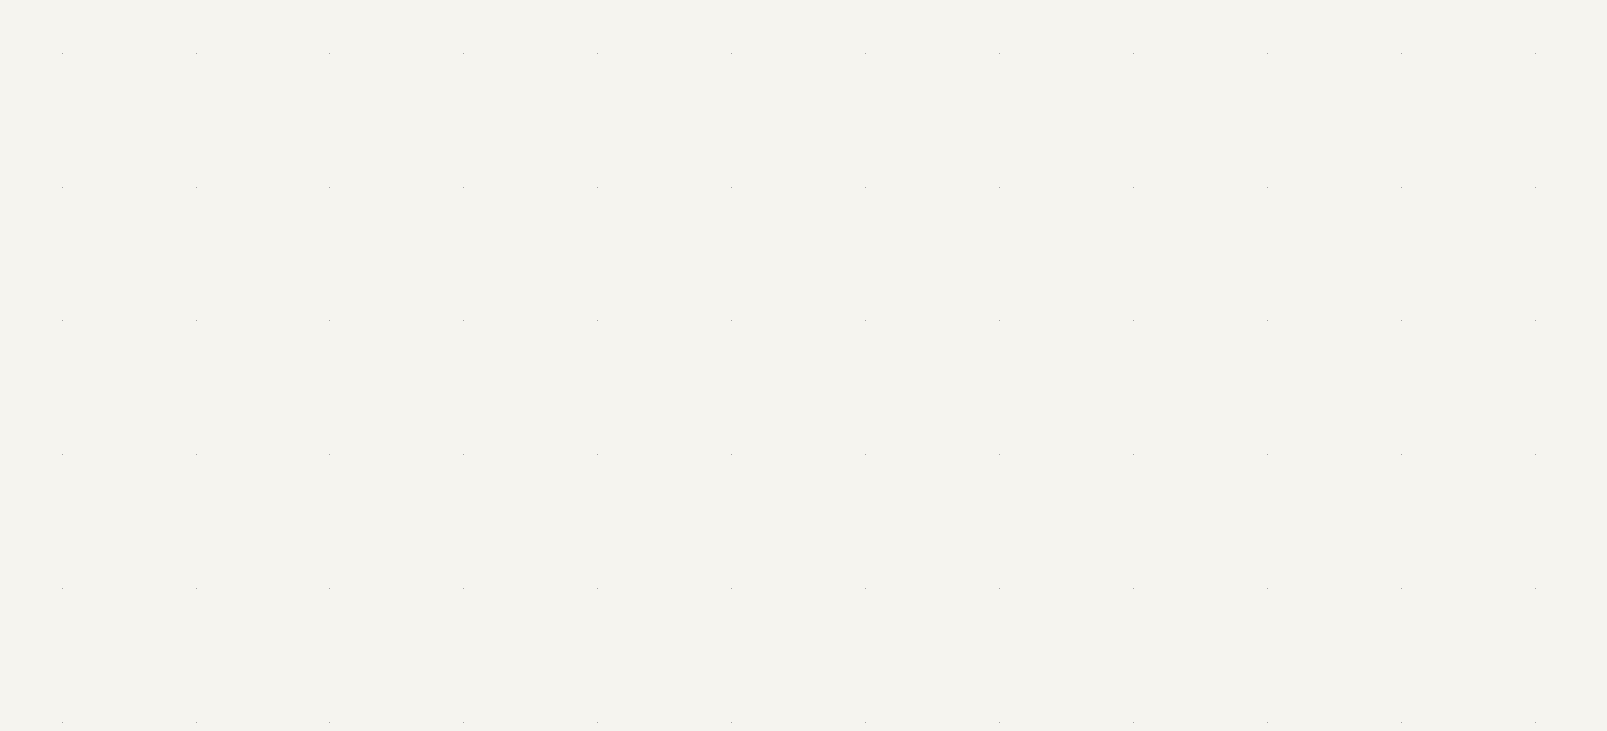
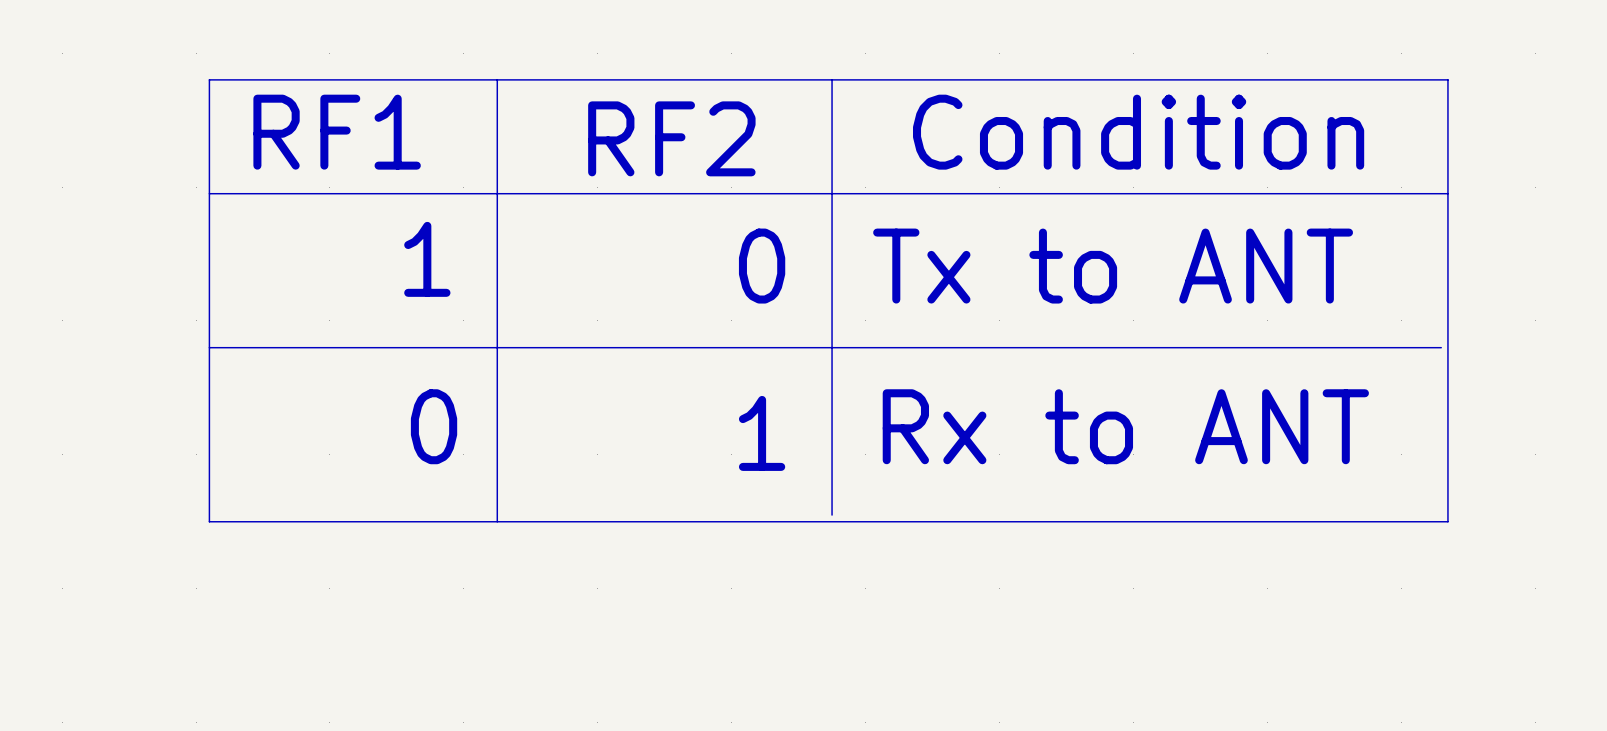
line: none -> (209, 79) (1447, 79) (1447, 521) (209, 521) (209, 79)
line: none -> (497, 79) (497, 521)
line: none -> (832, 79) (832, 515)
text: none -> RF1 (337, 132)
text: none -> Condition (1138, 132)
text: none -> RF2 (671, 138)
line: none -> (209, 193) (1447, 193)
text: none -> 1 (427, 259)
text: none -> 0 (762, 266)
text: none -> Tx to ANT (1113, 266)
line: none -> (209, 347) (1441, 347)
text: none -> 0 (434, 426)
text: none -> Rx to ANT (1125, 426)
text: none -> 1 (762, 433)

